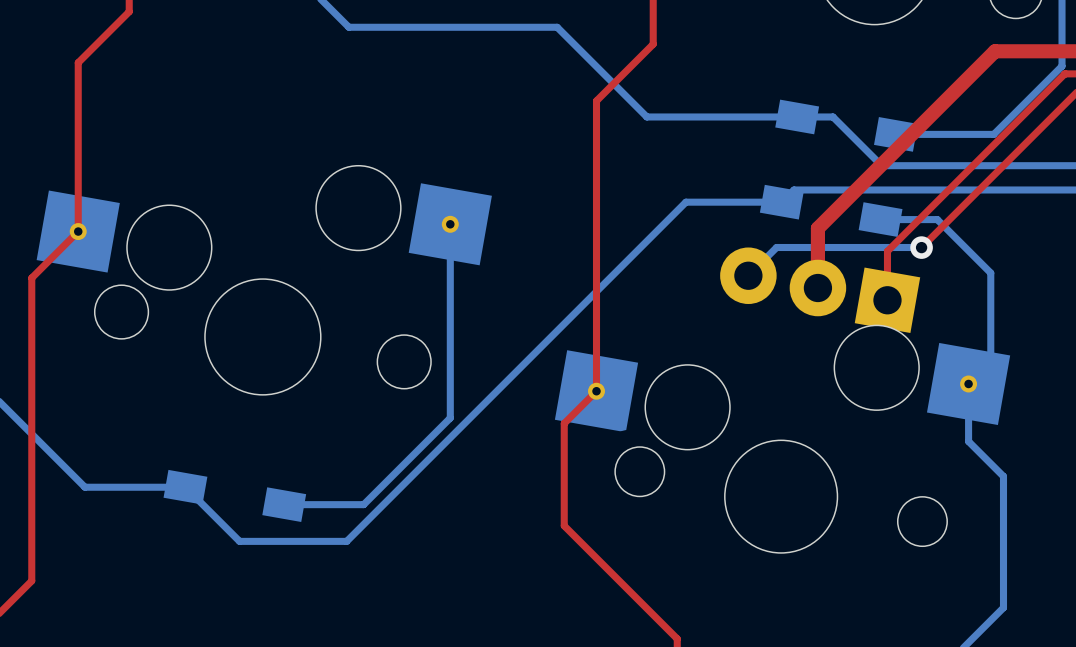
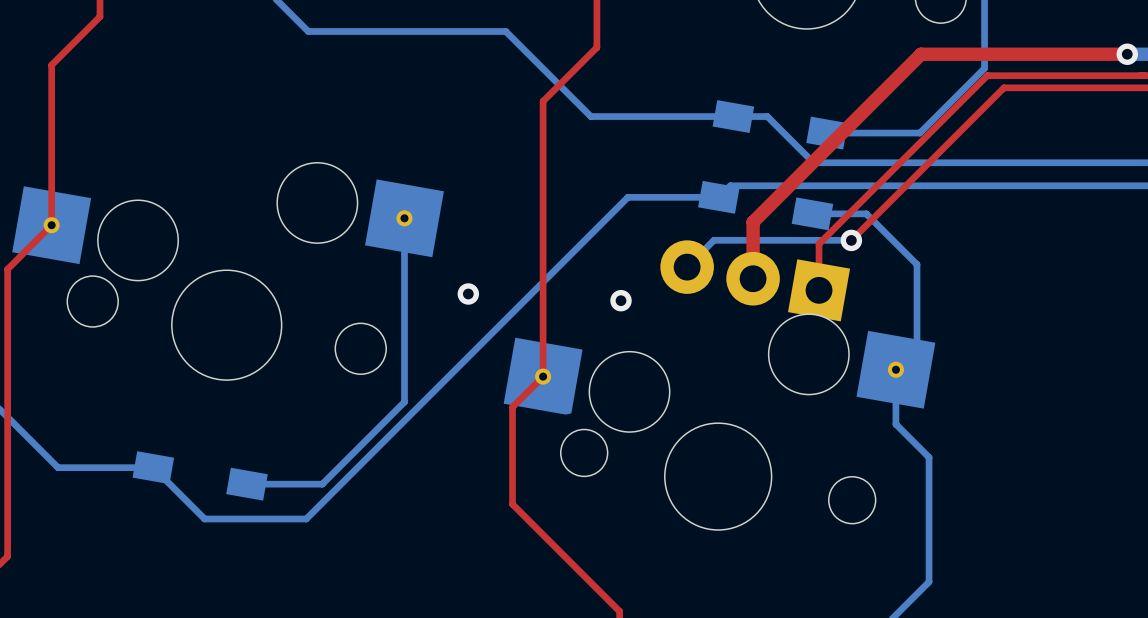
via: none -> (468, 293)
via: none -> (621, 300)

